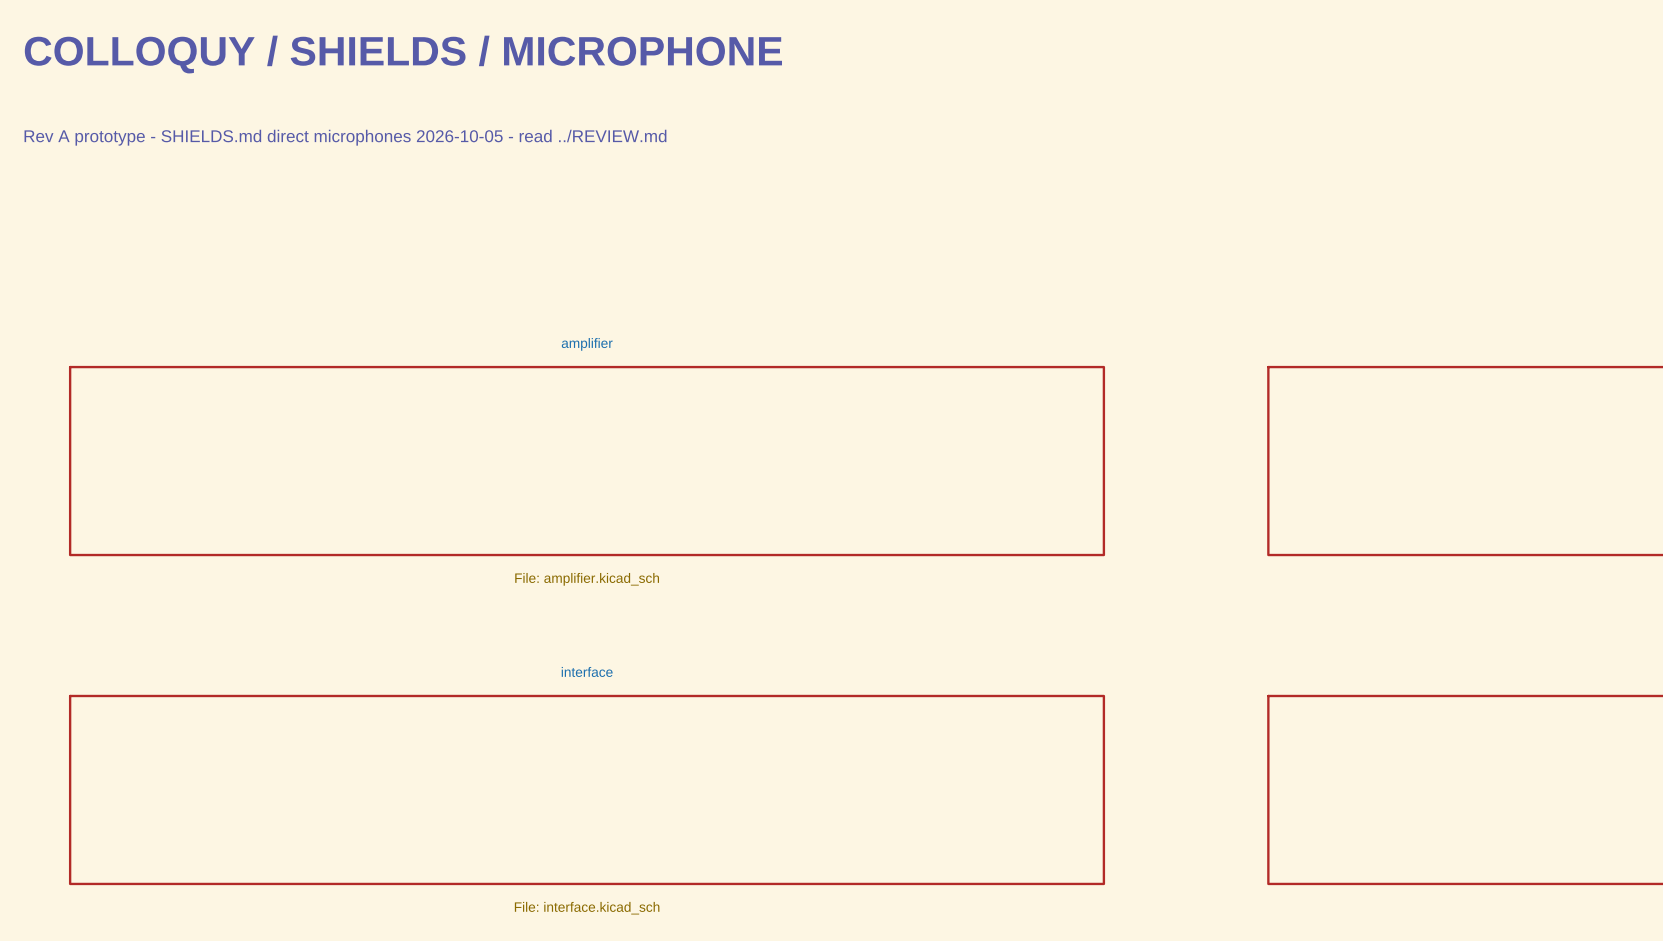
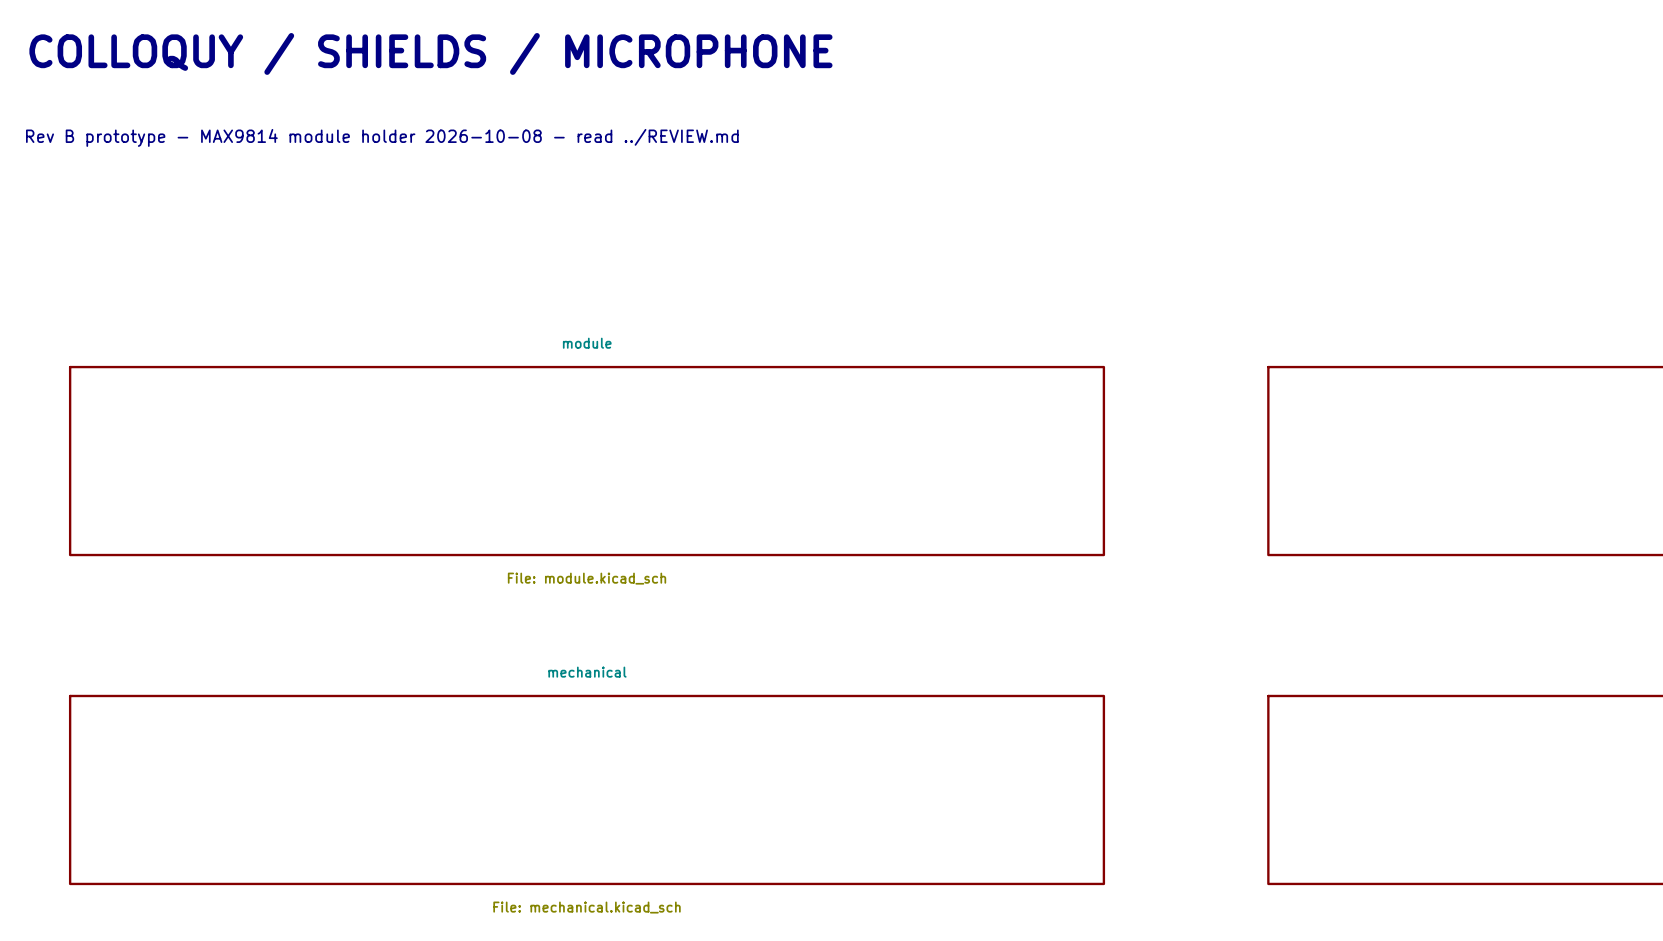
text: Rev A prototype - SHIELDS.md direct microphones 2026-10-05 - read ../REVIEW.md (345, 137) -> Rev B prototype - MAX9814 module holder 2026-10-08 - read ../REVIEW.md (382, 137)
sheet amplifier name: amplifier (587, 344) -> module (587, 343)
sheet amplifier value: File: amplifier.kicad_sch (587, 579) -> File: module.kicad_sch (587, 578)
sheet interface name: interface (587, 671) -> mechanical (587, 672)
sheet interface value: File: interface.kicad_sch (587, 908) -> File: mechanical.kicad_sch (587, 907)

